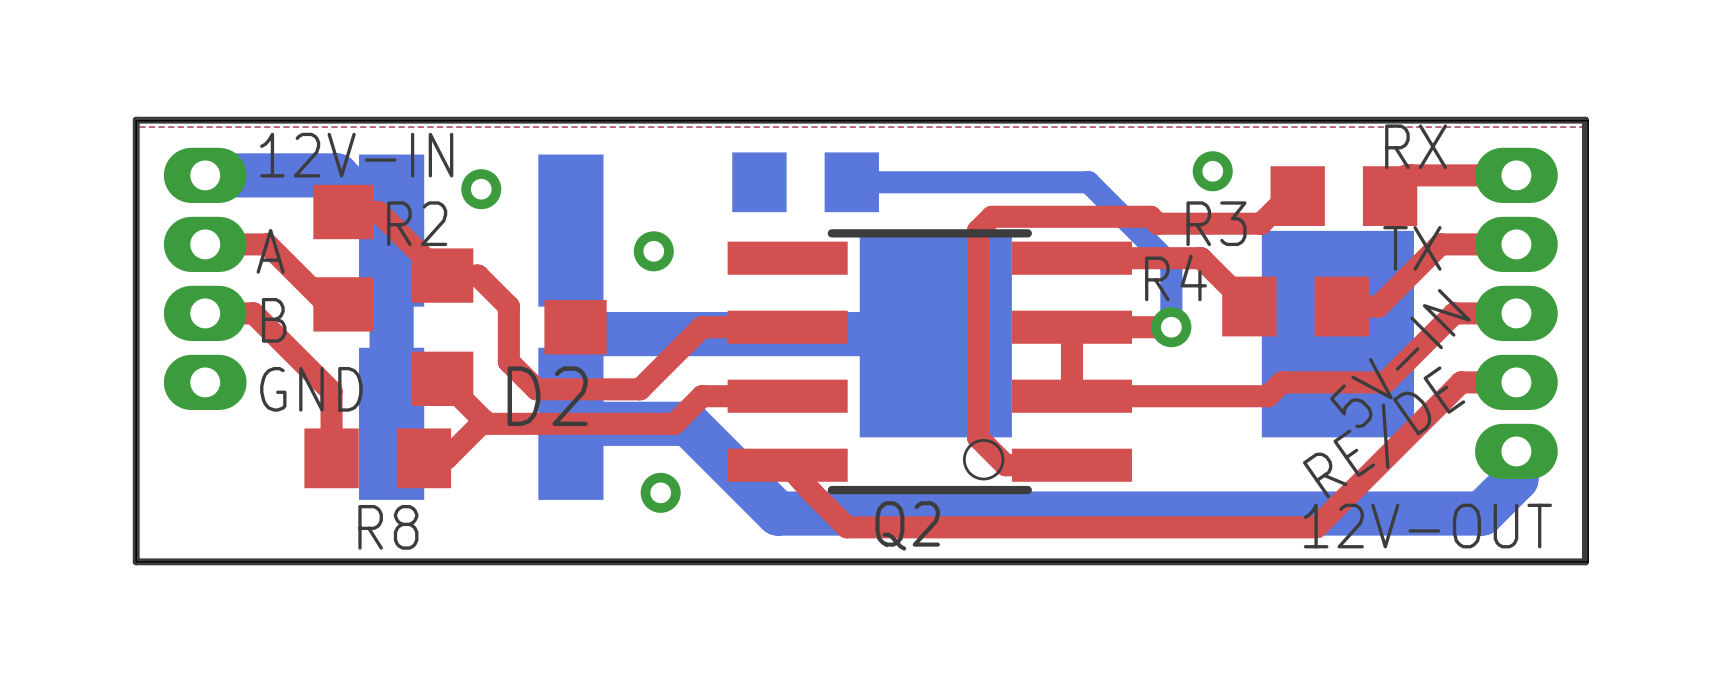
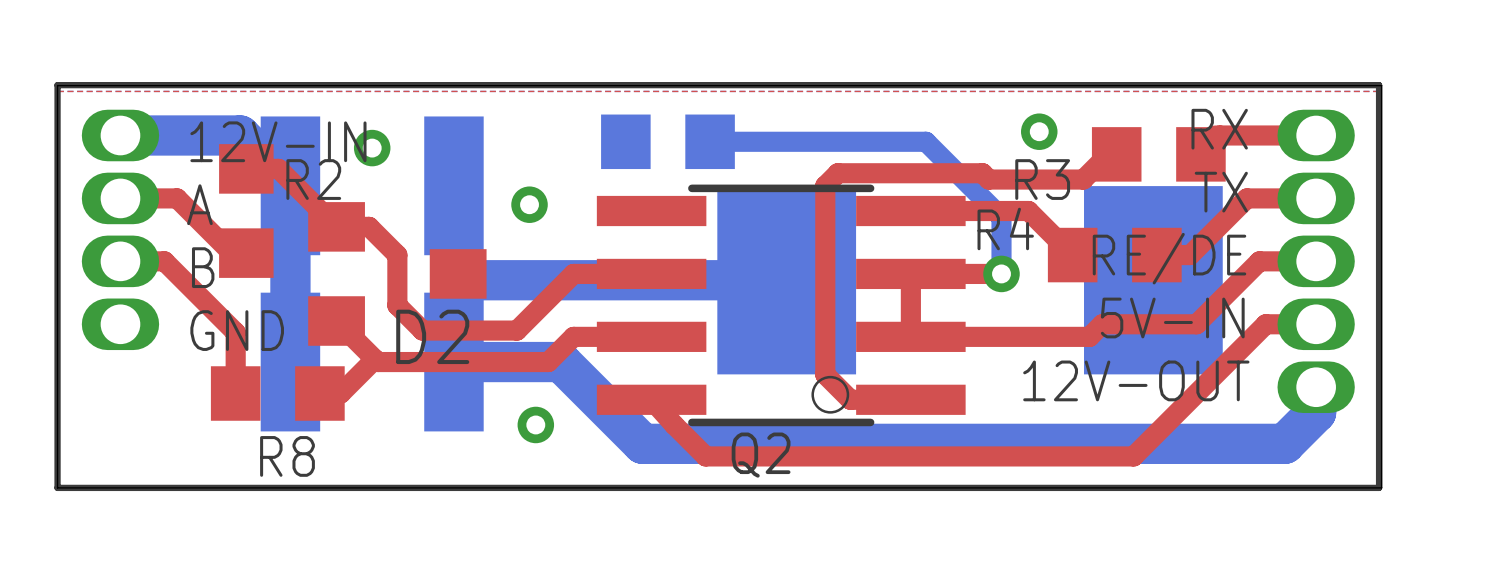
part footprint: [132, 116, 1589, 566] -> [54, 82, 1383, 492]

